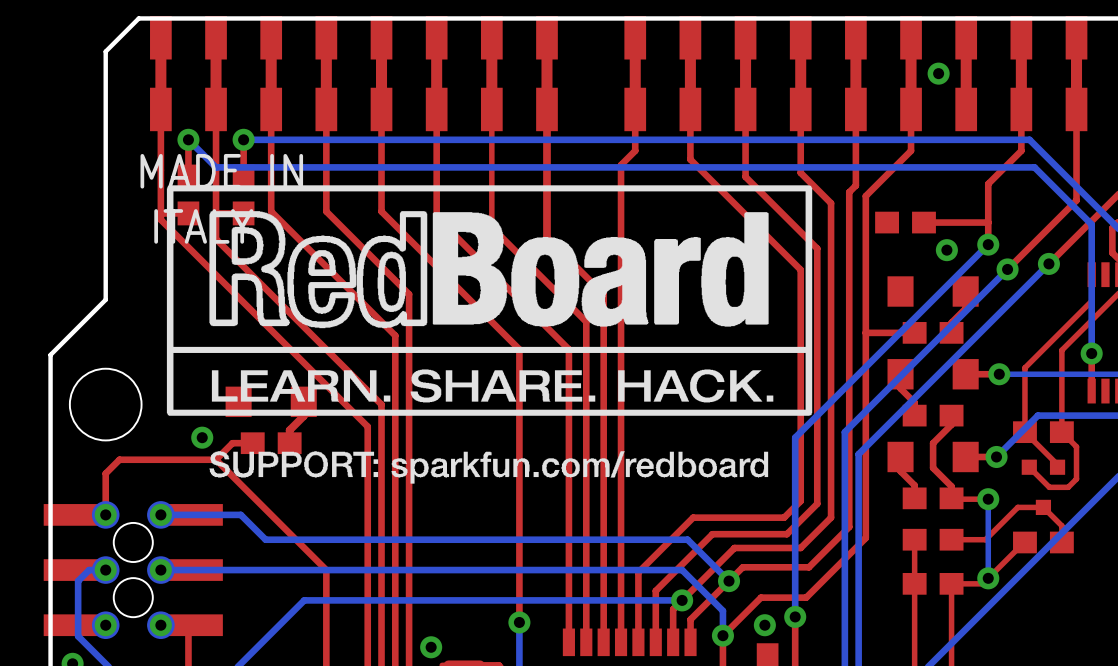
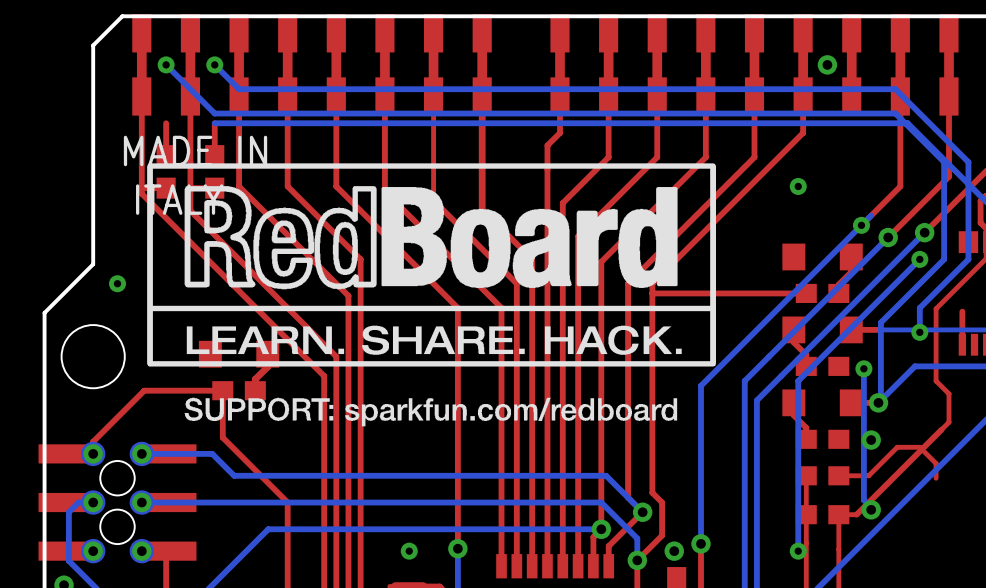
bottom track: none -> (166, 64) (214, 113) (895, 113) (944, 162) (944, 259) (880, 322) (880, 405)
via: none -> (166, 64)
bottom track: none -> (214, 64) (239, 89) (895, 89) (968, 162) (968, 259) (919, 308) (919, 332)
via: none -> (214, 64)
bottom track: (188, 139) (216, 167) (1034, 167) (1091, 224) (1091, 353) -> none
via: (188, 139) -> none
via: (243, 139) -> none
top track: (1021, 150) (988, 183) (988, 244) -> (900, 132) (900, 186) (861, 225)
top track: (690, 159) (800, 269) (800, 501) (784, 517) (693, 517) (638, 572) -> (608, 140) (608, 157) (562, 203) (562, 504)
top track: (800, 172) (831, 203) (831, 517) (800, 547) (734, 547) (682, 600) -> (705, 152) (705, 157) (601, 261) (601, 529)
top track: (745, 176) (817, 248) (817, 503) (786, 534) (712, 534) (655, 590) -> (657, 155) (578, 236) (578, 520)
top track: (855, 178) (855, 185) (849, 192) (849, 527) (808, 567) (742, 567) (729, 581) -> (754, 157) (628, 283) (628, 497) (642, 512)
top track: (865, 196) (865, 538) (806, 597) (761, 597) (751, 607) -> (763, 172) (652, 283) (652, 492) (662, 502) (662, 535)
via: none -> (798, 186)
part: (905, 222) -> none
top track: (988, 222) (923, 222) -> none
via position: (988, 244) -> (861, 225)
via: (946, 250) -> none
top track: (1091, 274) (1091, 301) (1024, 367) (1024, 432) (1057, 464) (1057, 467) -> none
bottom track: none -> (919, 259) (798, 380) (798, 551)
via: none -> (919, 259)
via: none -> (117, 283)
top track: none -> (763, 293) (652, 293)
via: (1091, 353) -> none
via: (999, 374) -> none
via: none -> (919, 332)
top track: (951, 415) (951, 424) (933, 443) (933, 468) (951, 486) (951, 499) (988, 499) -> none
bottom track: none -> (863, 368) (863, 500) (867, 503)
via: none -> (863, 368)
part: (1043, 432) -> none
via: (202, 437) -> none
top track: (232, 443) (216, 459) -> none
top track: (216, 459) (119, 459) (105, 473) (105, 501) -> (205, 390) (144, 390) (93, 441)
top track: (216, 459) (252, 496) -> (222, 390) (222, 437)
top track: (1029, 467) (1049, 487) (1068, 487) -> none
part: (1043, 487) -> none
bottom track: (988, 499) (988, 578) -> none
top track: (1024, 542) (982, 583) (971, 583) -> (941, 429) (856, 514)
part: (1043, 542) -> none
via: none -> (409, 551)
via: none -> (798, 551)
via: (431, 647) -> none

